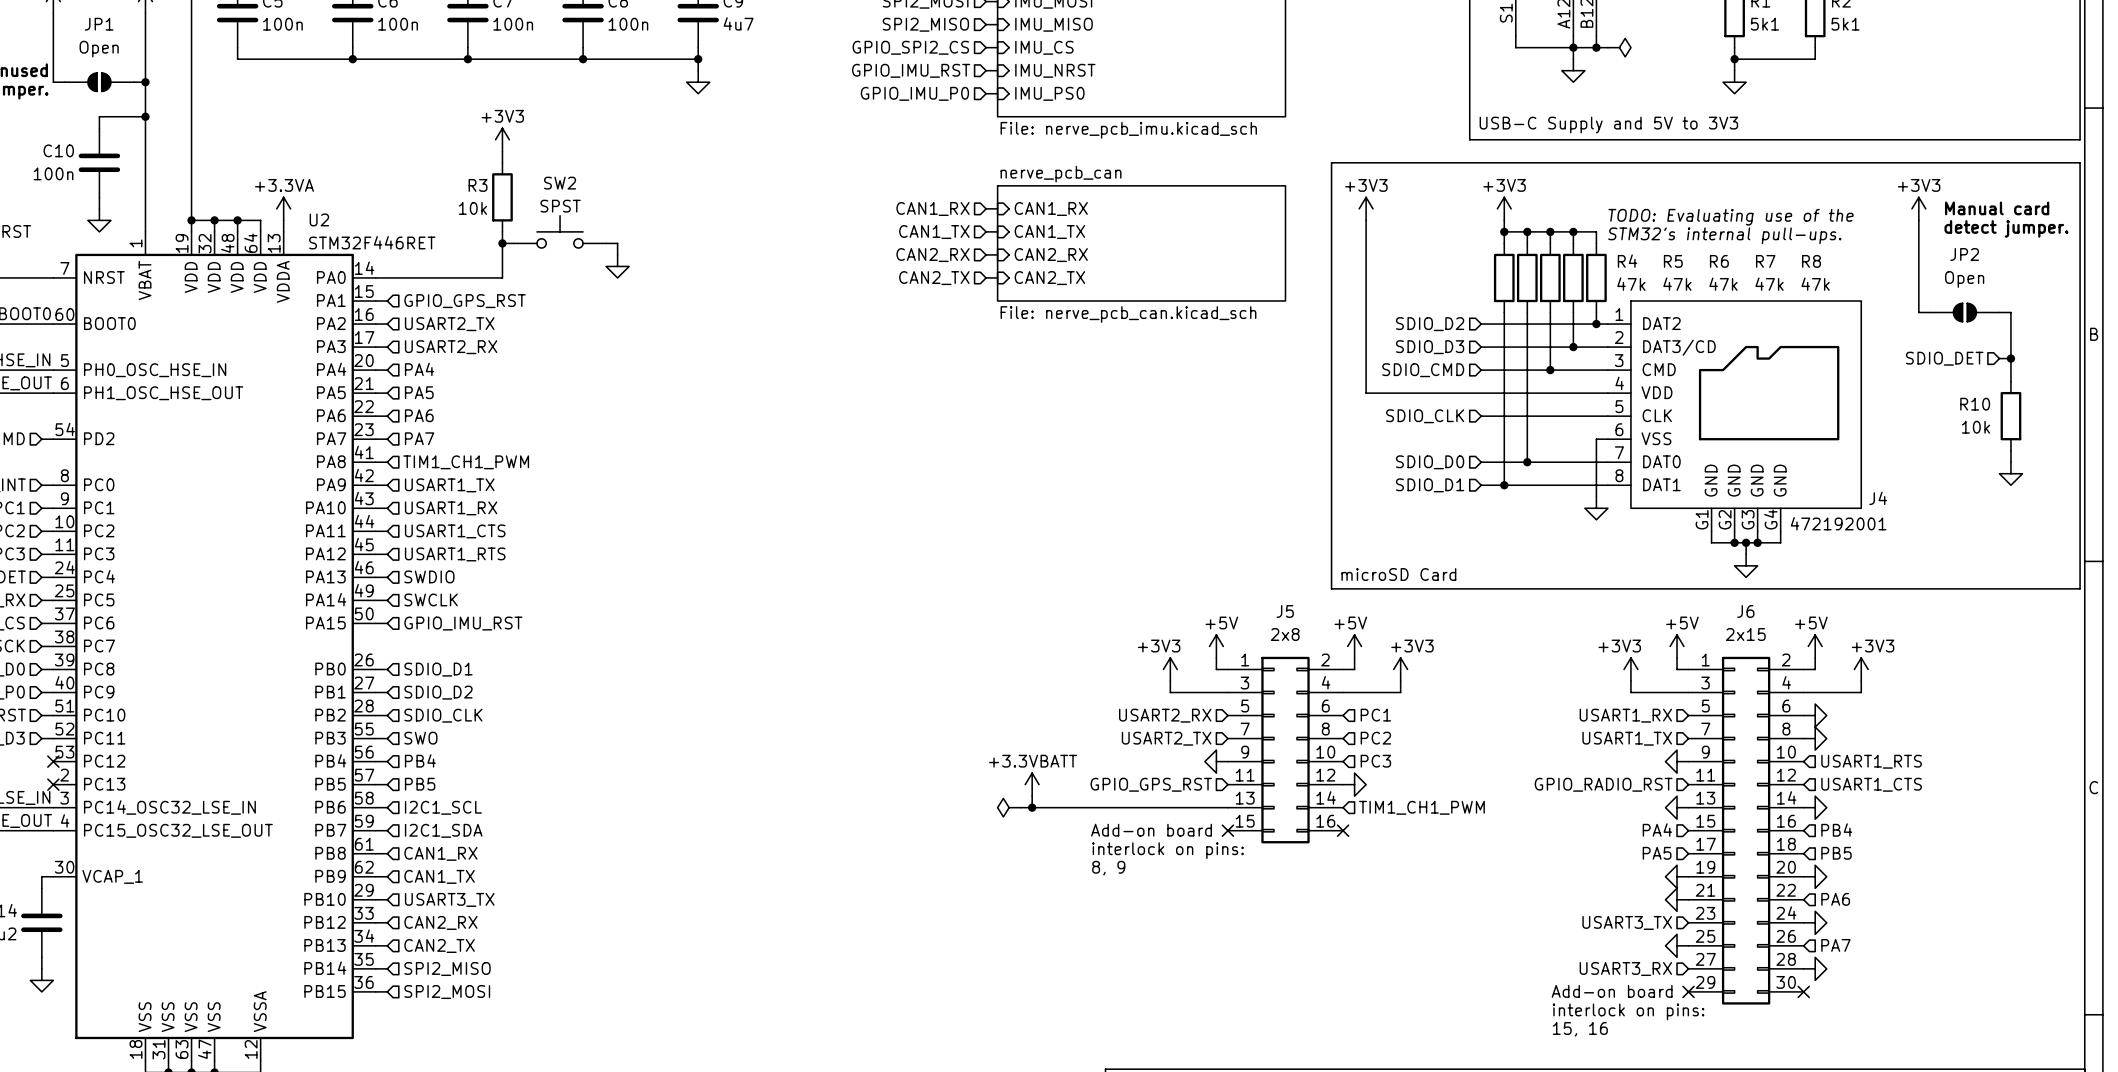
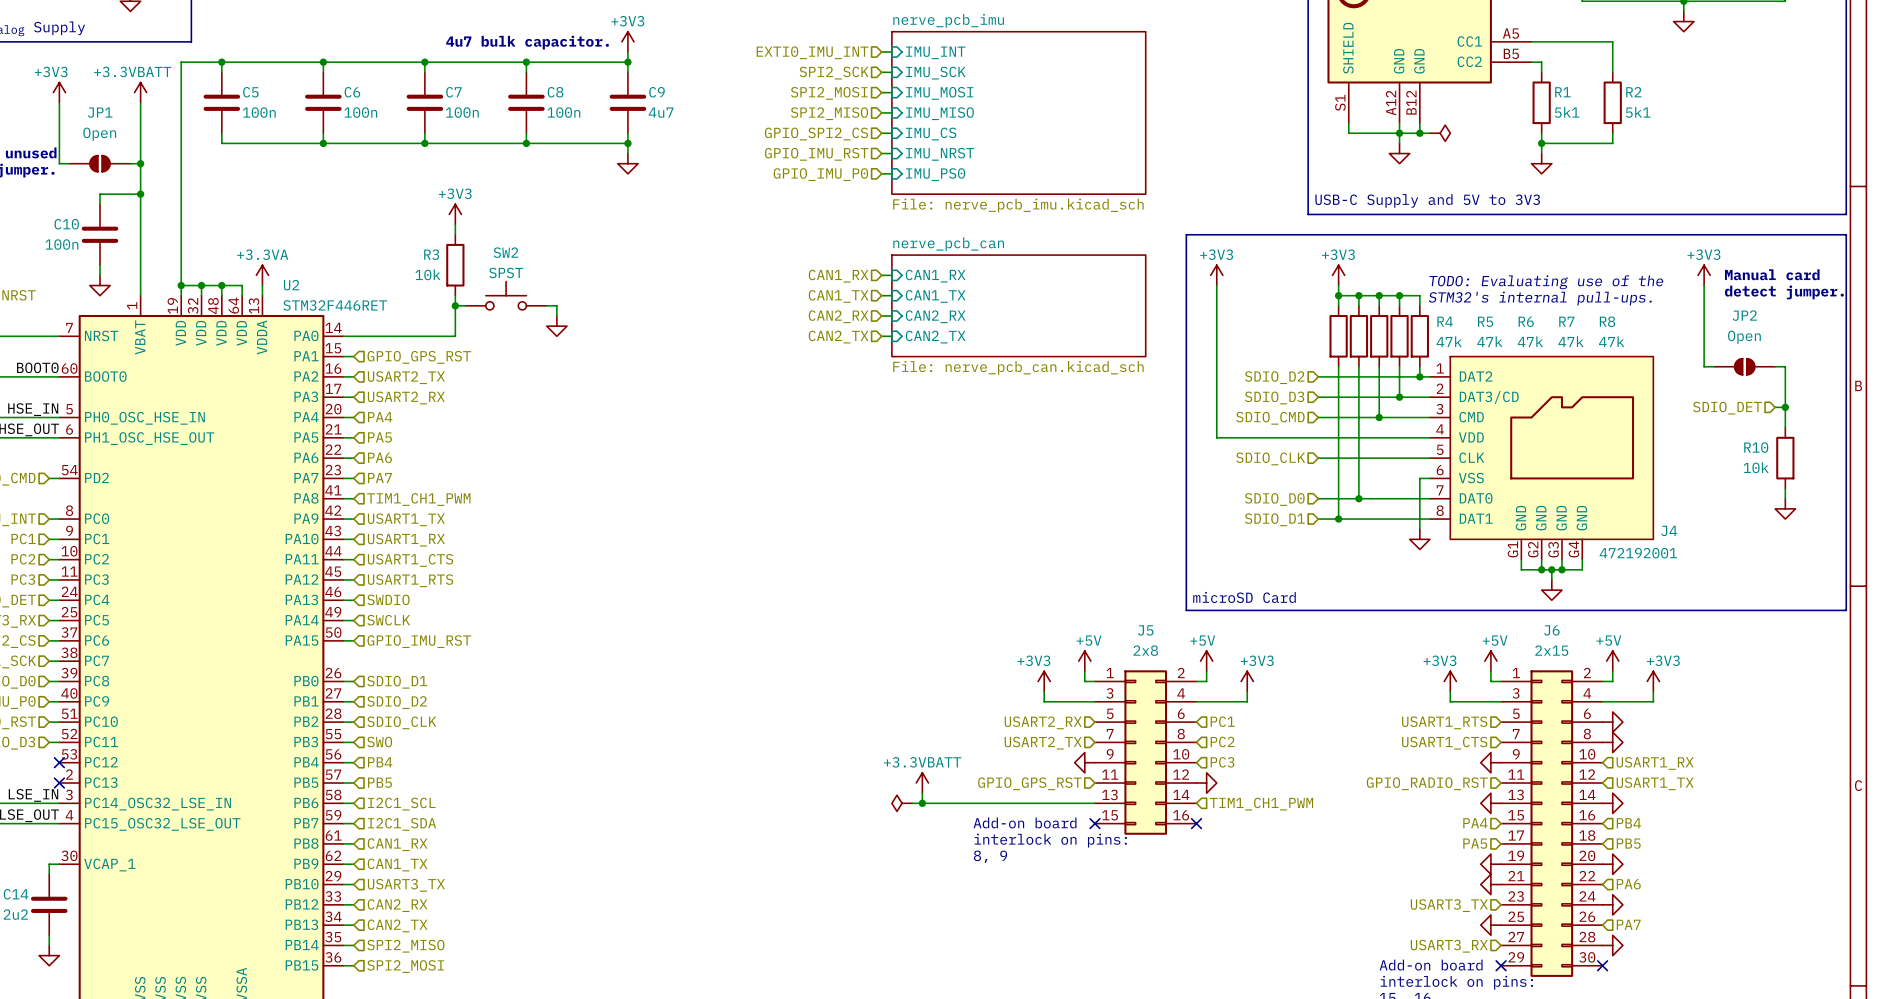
hierarchical label: USART1_RX (1625, 715) -> USART1_RTS (1444, 722)
hierarchical label: USART1_TX (1627, 738) -> USART1_CTS (1444, 743)
hierarchical label: USART1_RTS (1871, 761) -> USART1_RX (1655, 763)
hierarchical label: USART1_CTS (1871, 784) -> USART1_TX (1655, 783)

